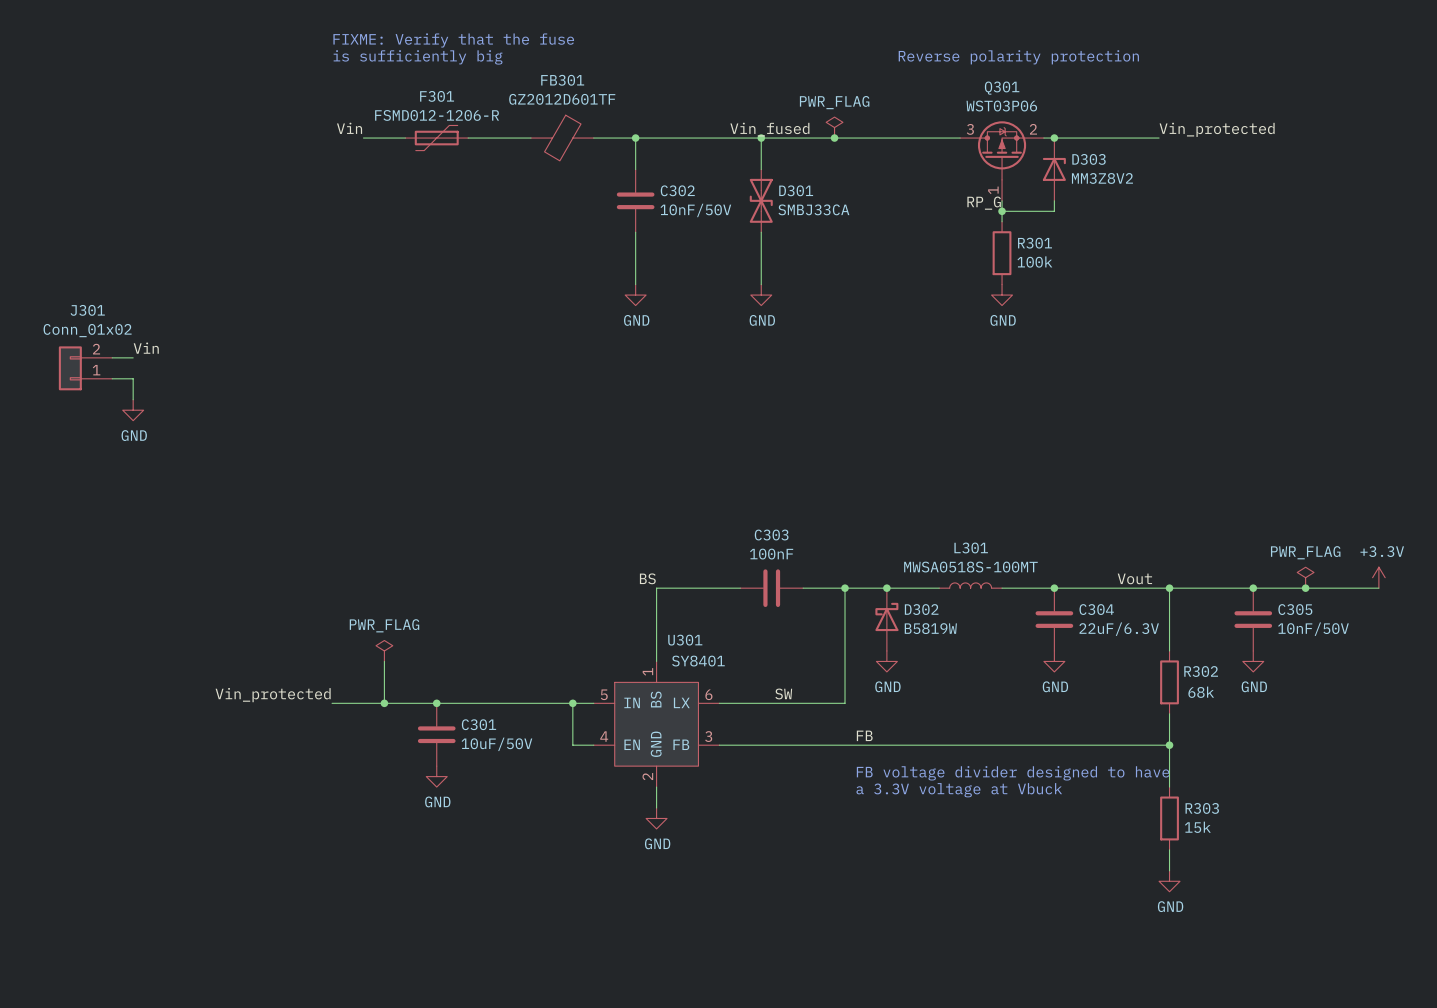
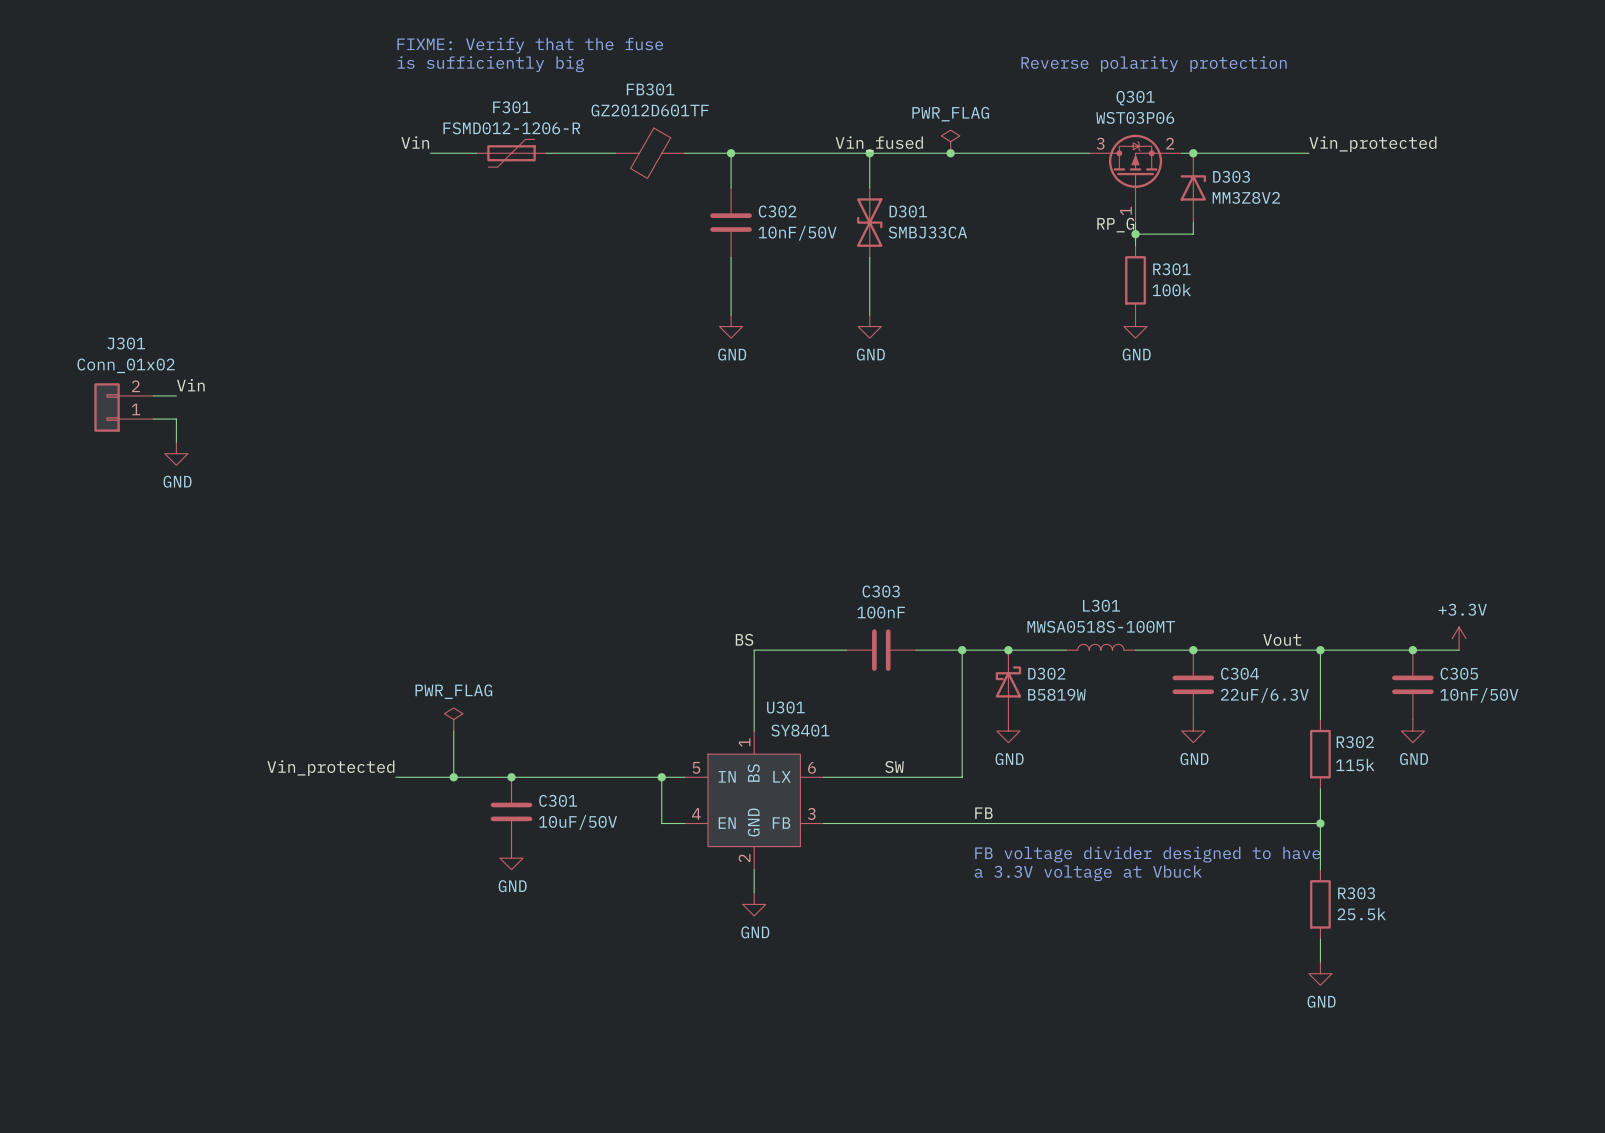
power symbol: PWR_FLAG (1305, 577) -> none
power symbol position: +3.3V (1378, 577) -> +3.3V (1459, 638)
wire: (1295, 588) (1378, 588) -> none
junction: (1305, 588) -> none
R302 value: 68k (1201, 692) -> 115k (1355, 765)
R303 value: 15k (1197, 827) -> 25.5k (1361, 914)

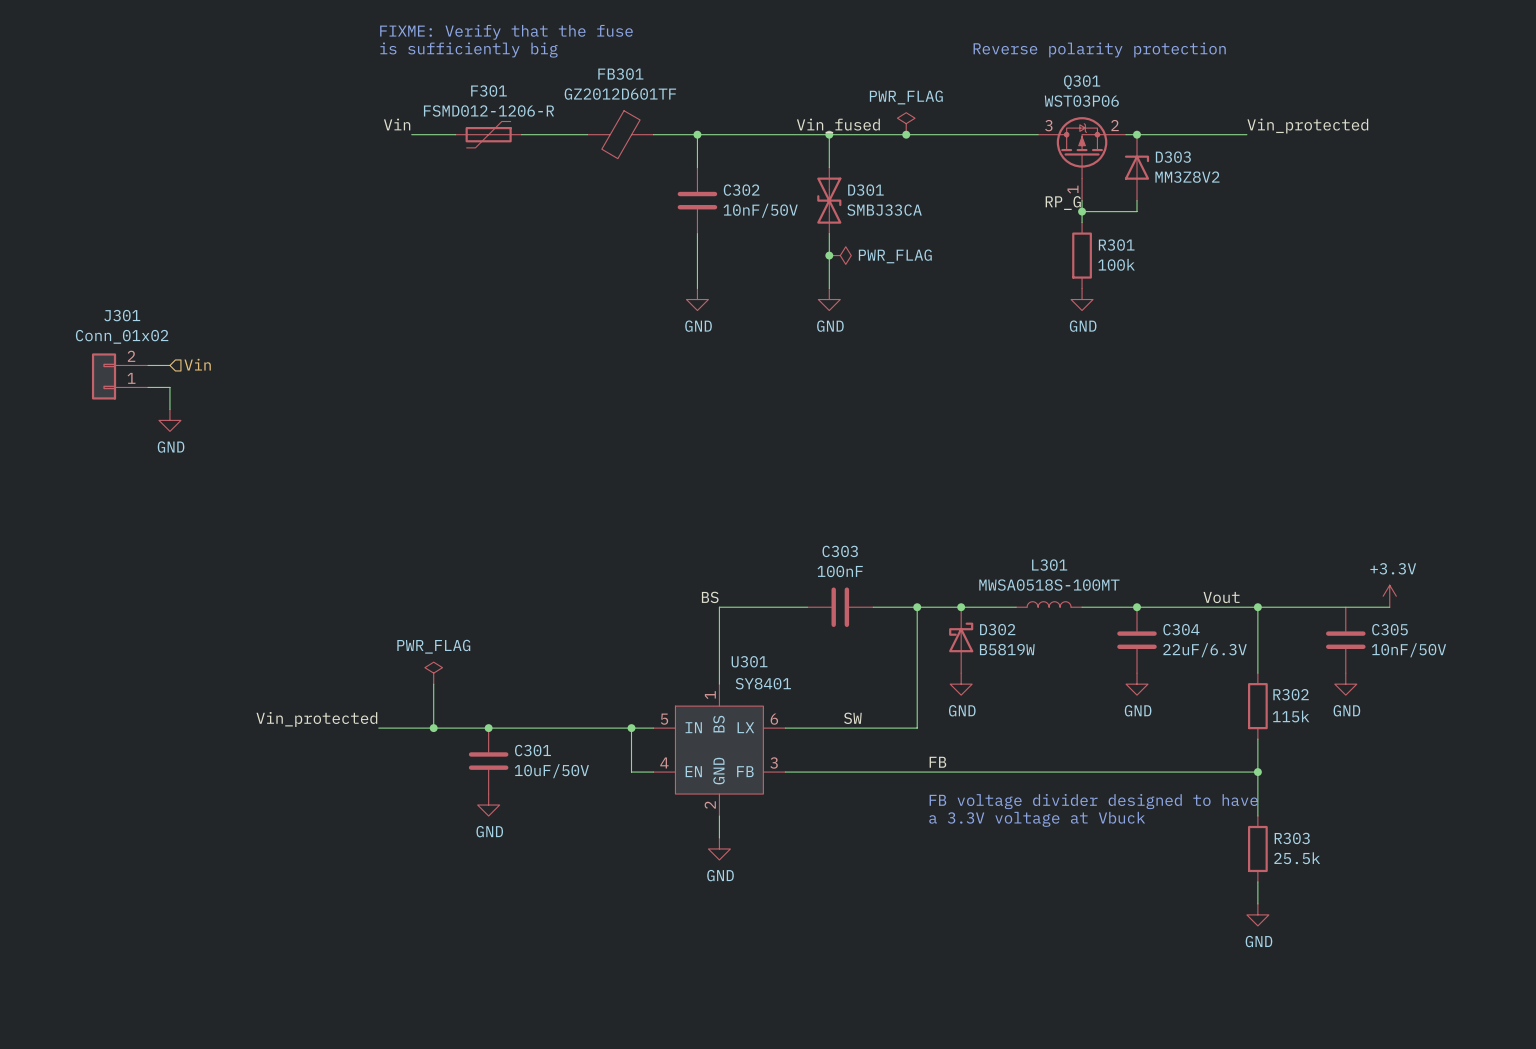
junction: none -> (829, 255)
power symbol: none -> PWR_FLAG (840, 255)
label: Vin (190, 385) -> none
hierarchical label: none -> Vin (197, 364)
junction: (1412, 650) -> none

